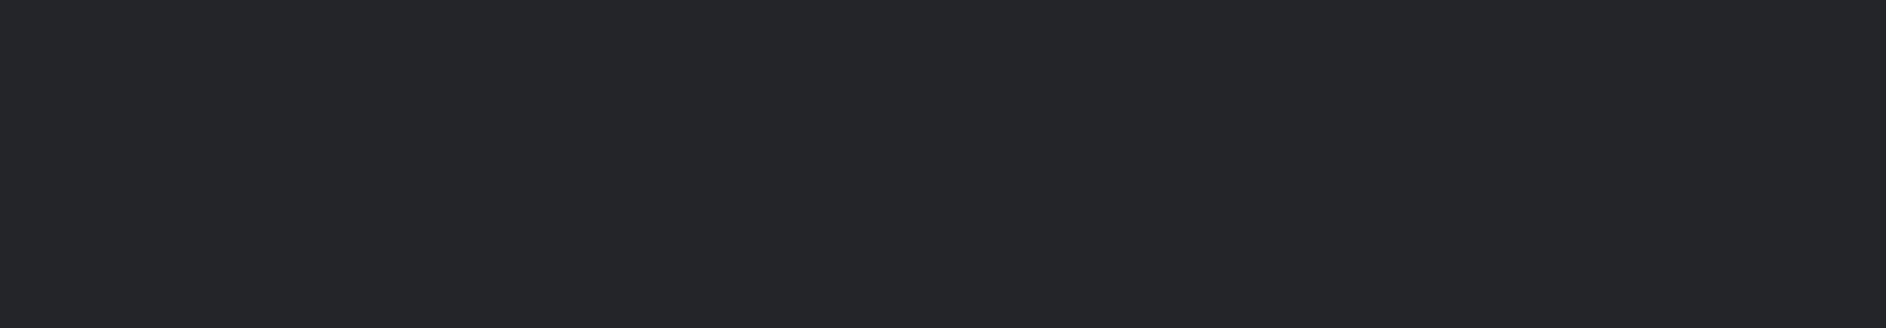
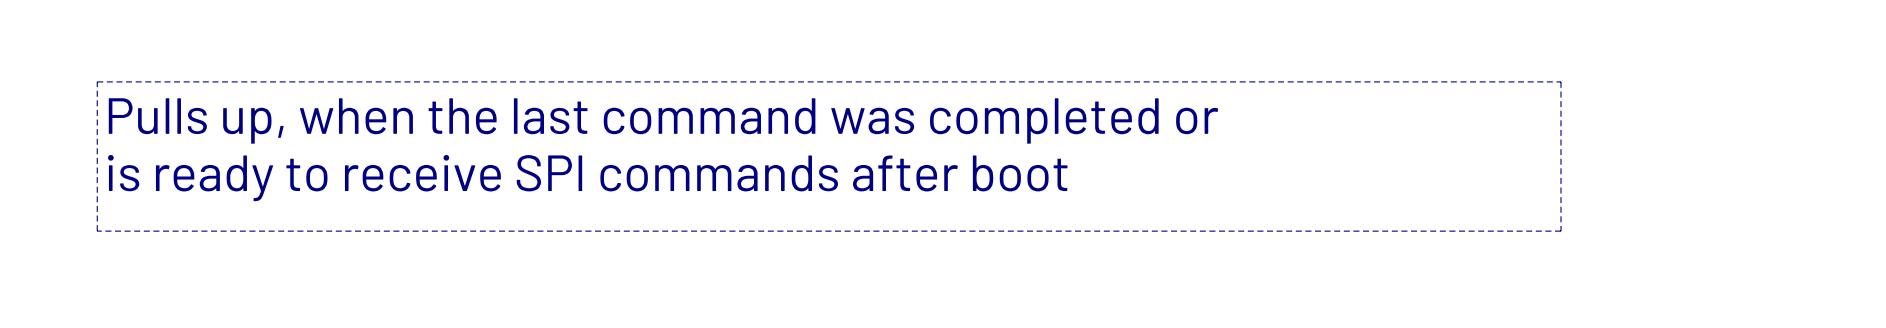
line: none -> (97, 81) (1561, 81) (1561, 231) (97, 231) (97, 81)
text: none -> Pulls up, when the last command was completed or (663, 120)
text: none -> is ready to receive SPI commands after boot (587, 178)

